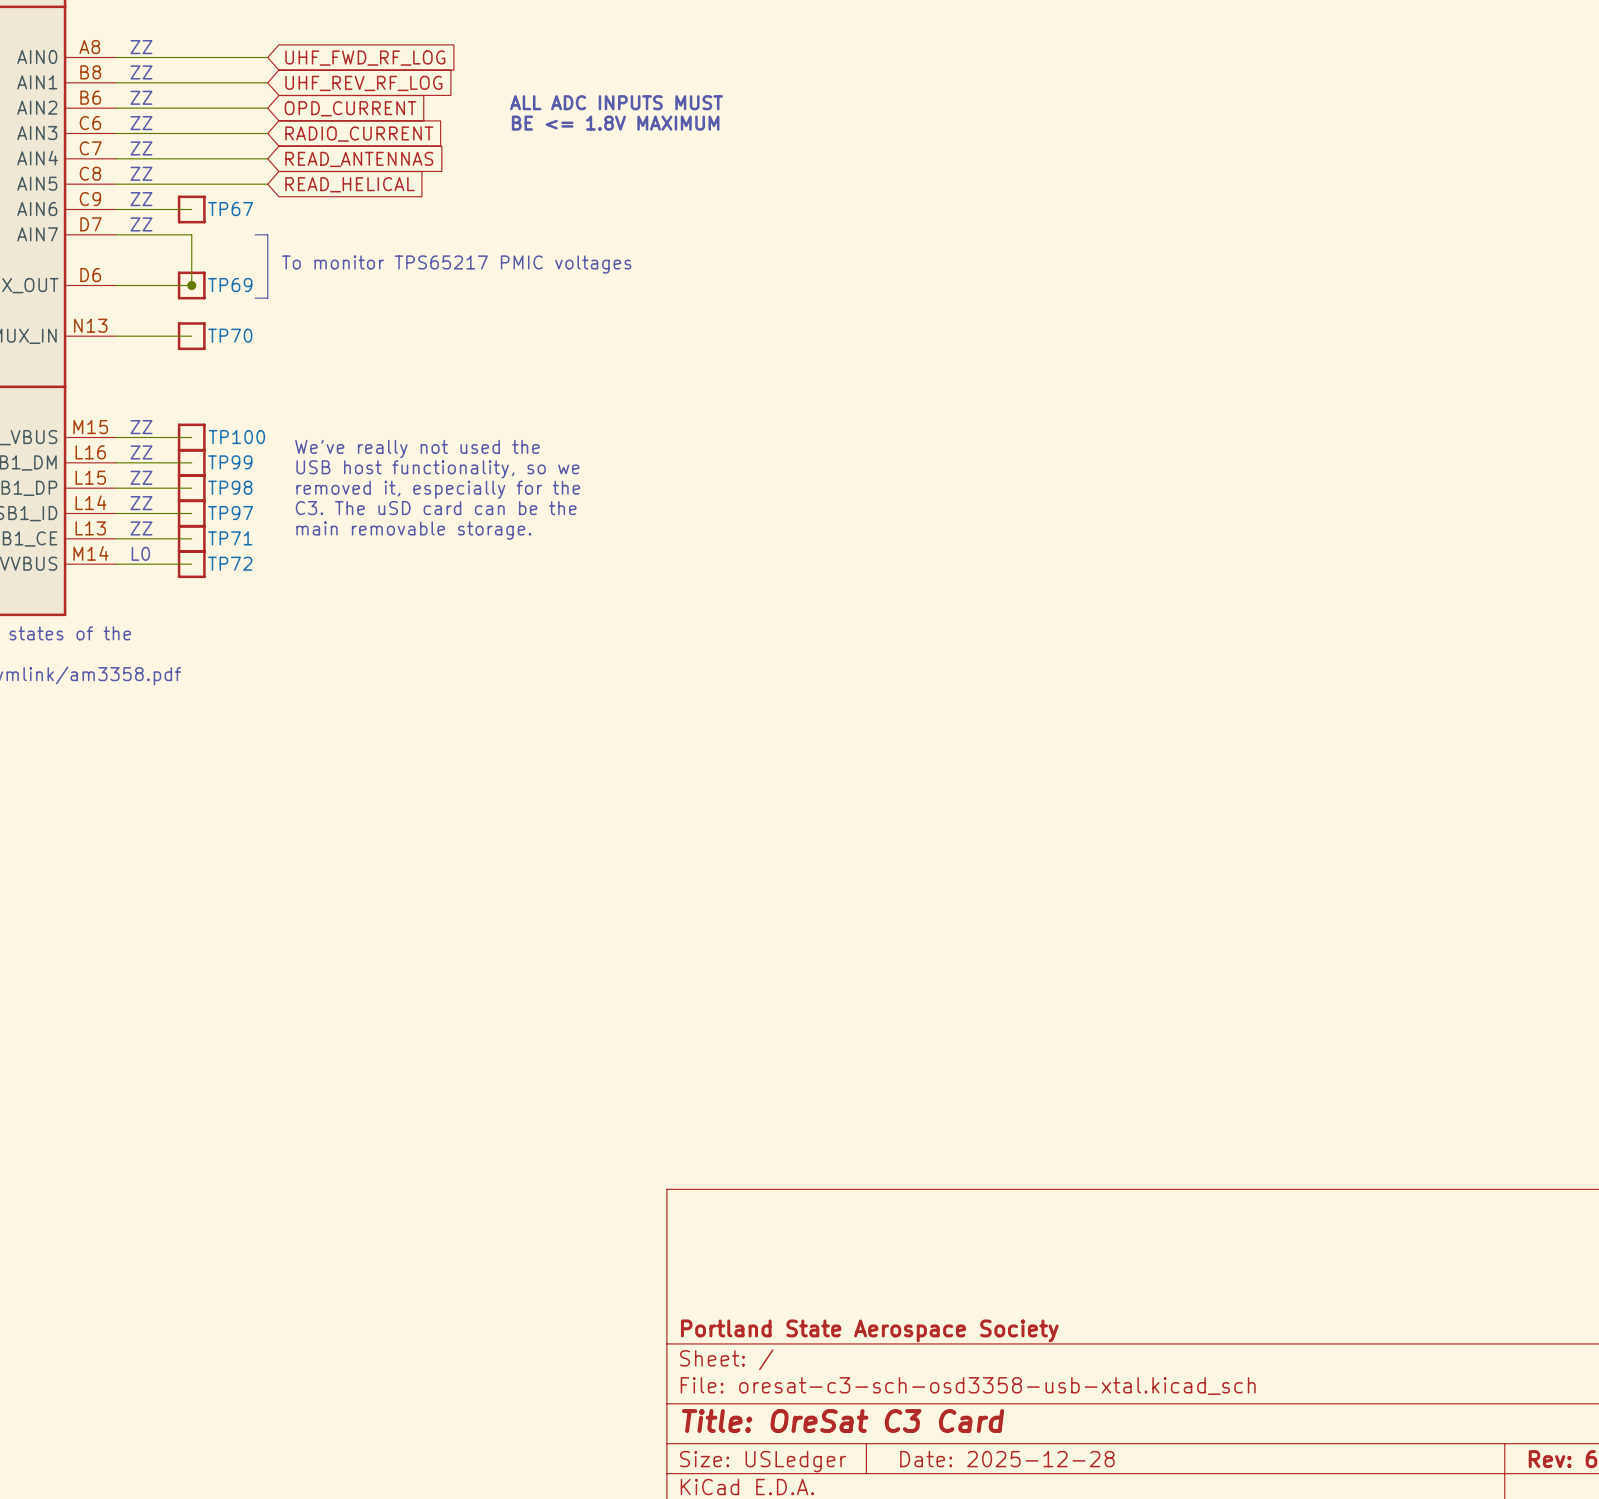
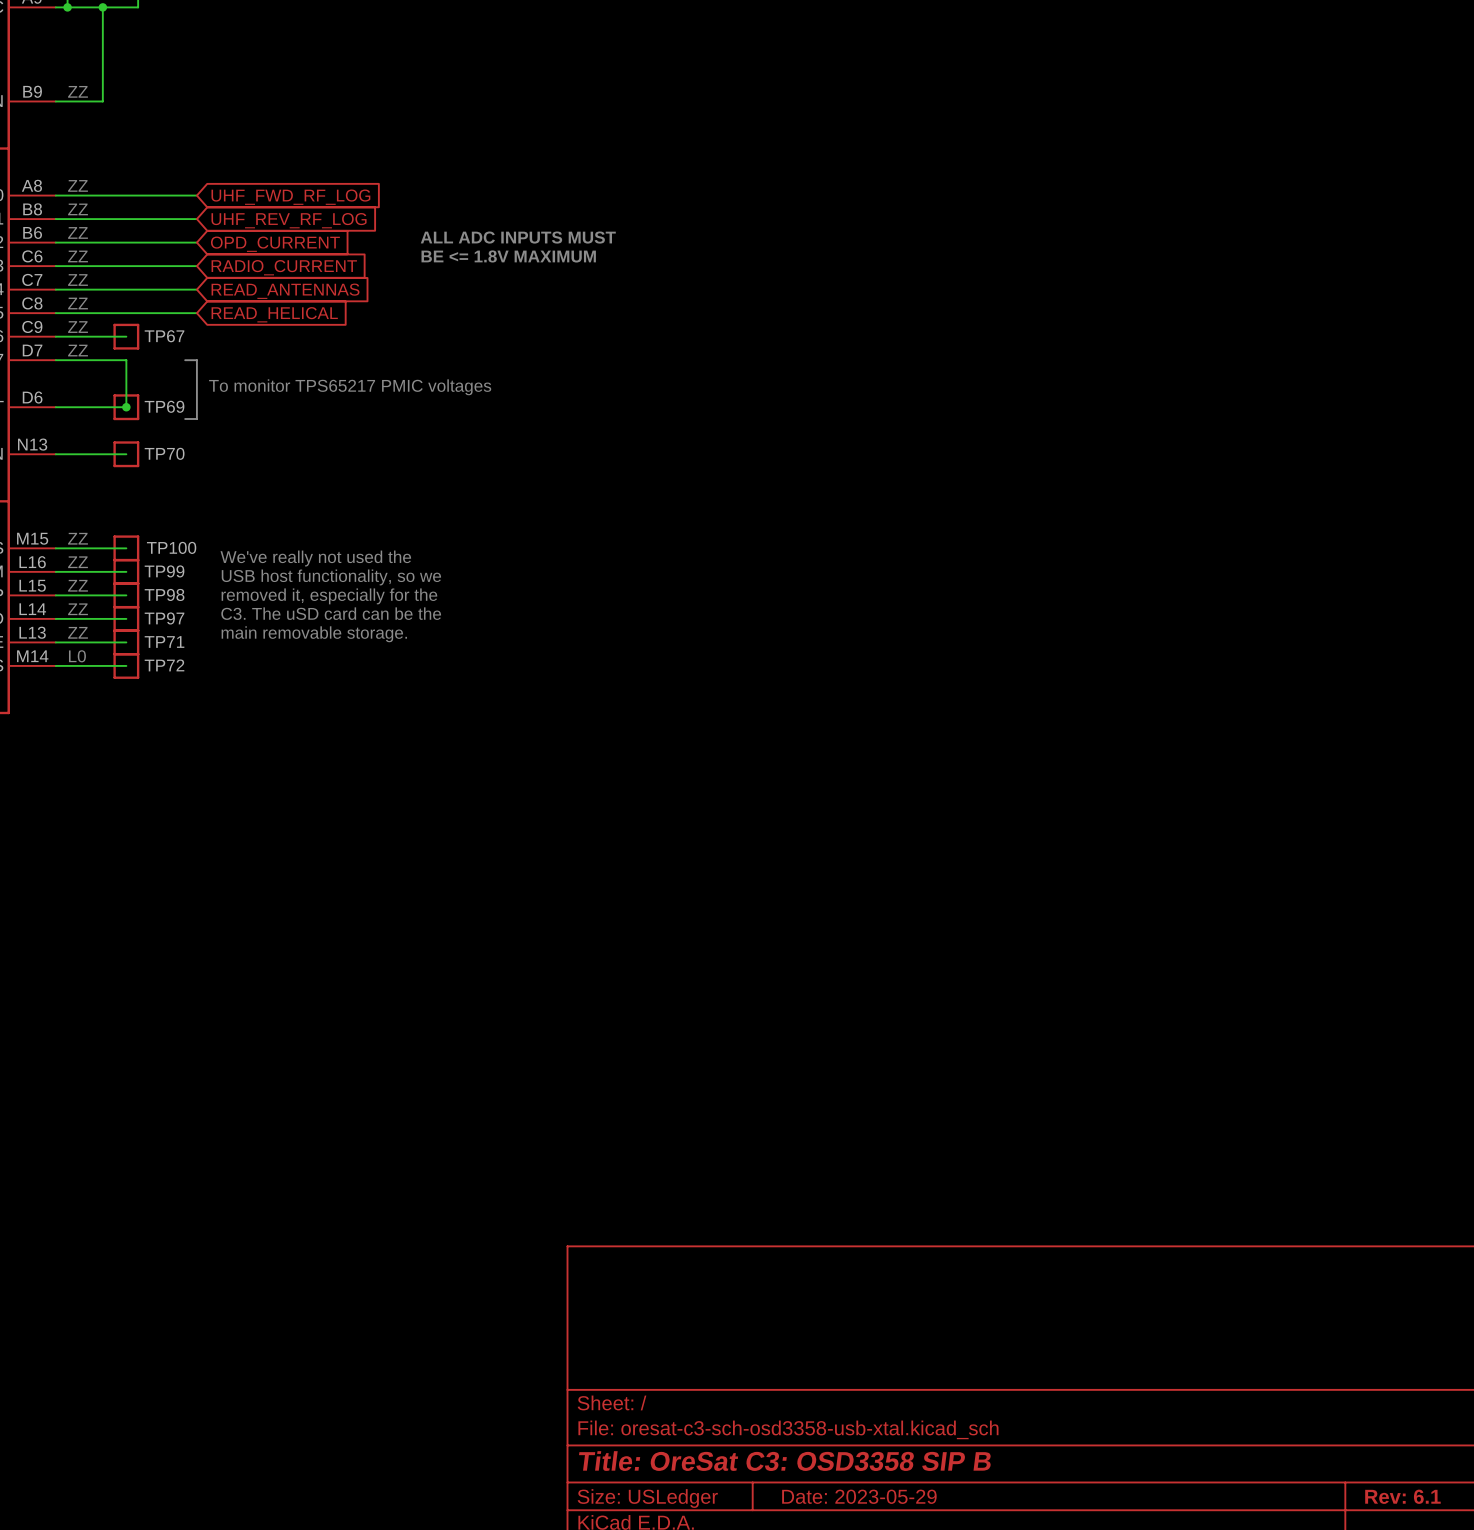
title block: Portland State Aerospace Society (869, 1330) -> none
title block: Title: OreSat C3 Card (843, 1421) -> Title: OreSat C3: OSD3358 SIP B (784, 1461)
title block: Date: 2025-12-28 (1007, 1459) -> Date: 2023-05-29 (859, 1496)

